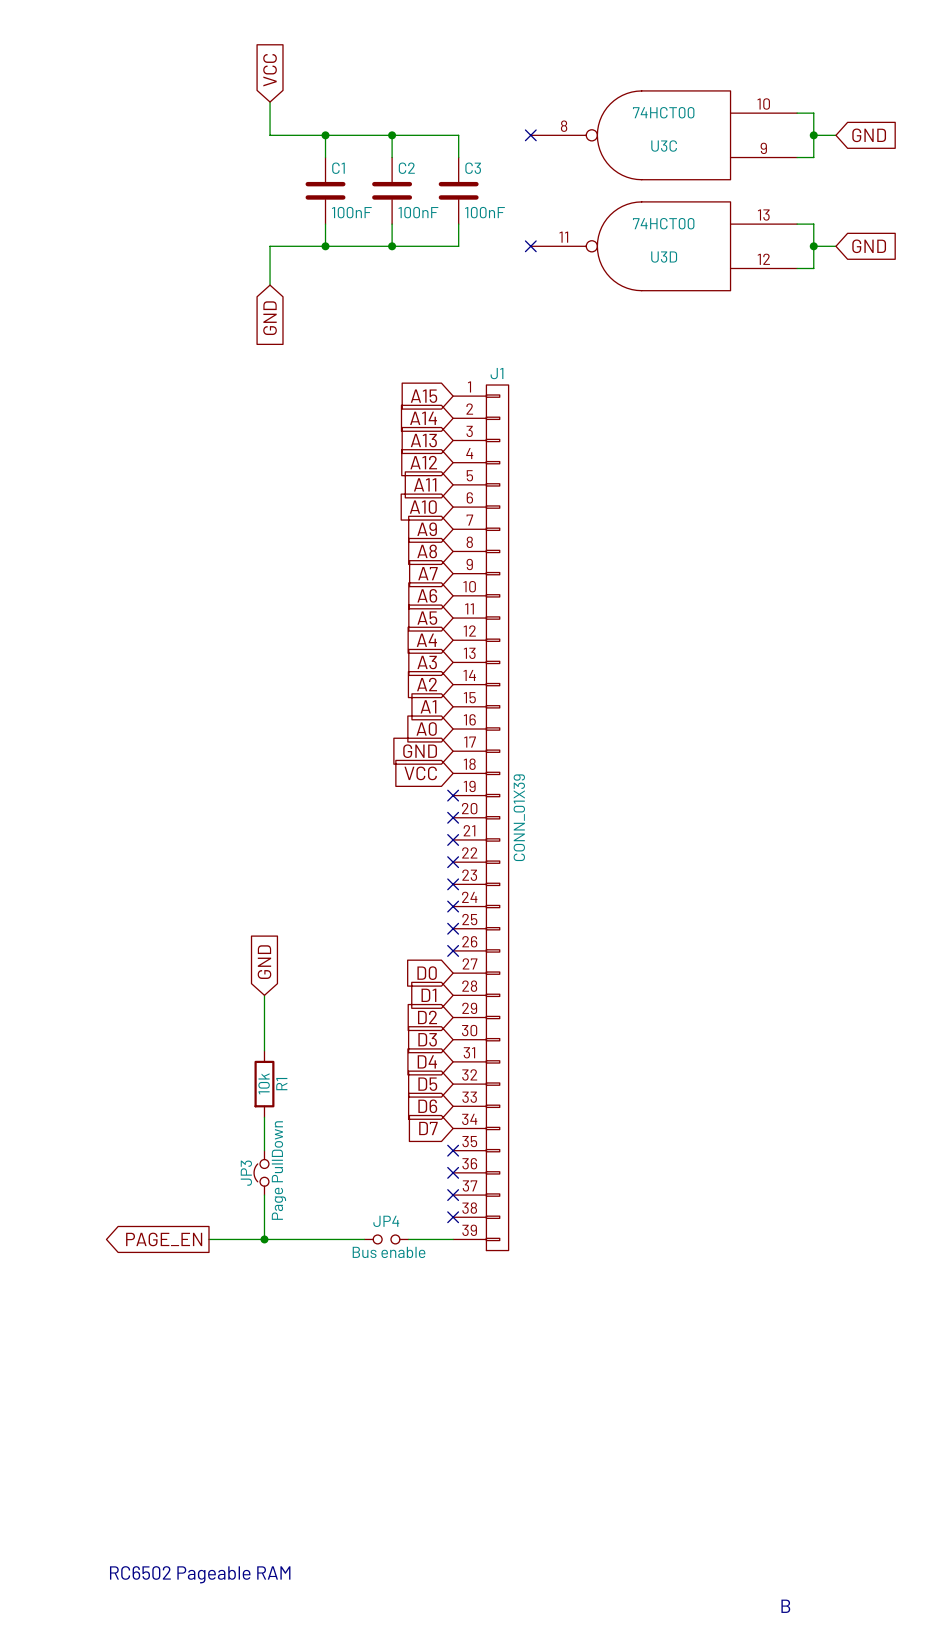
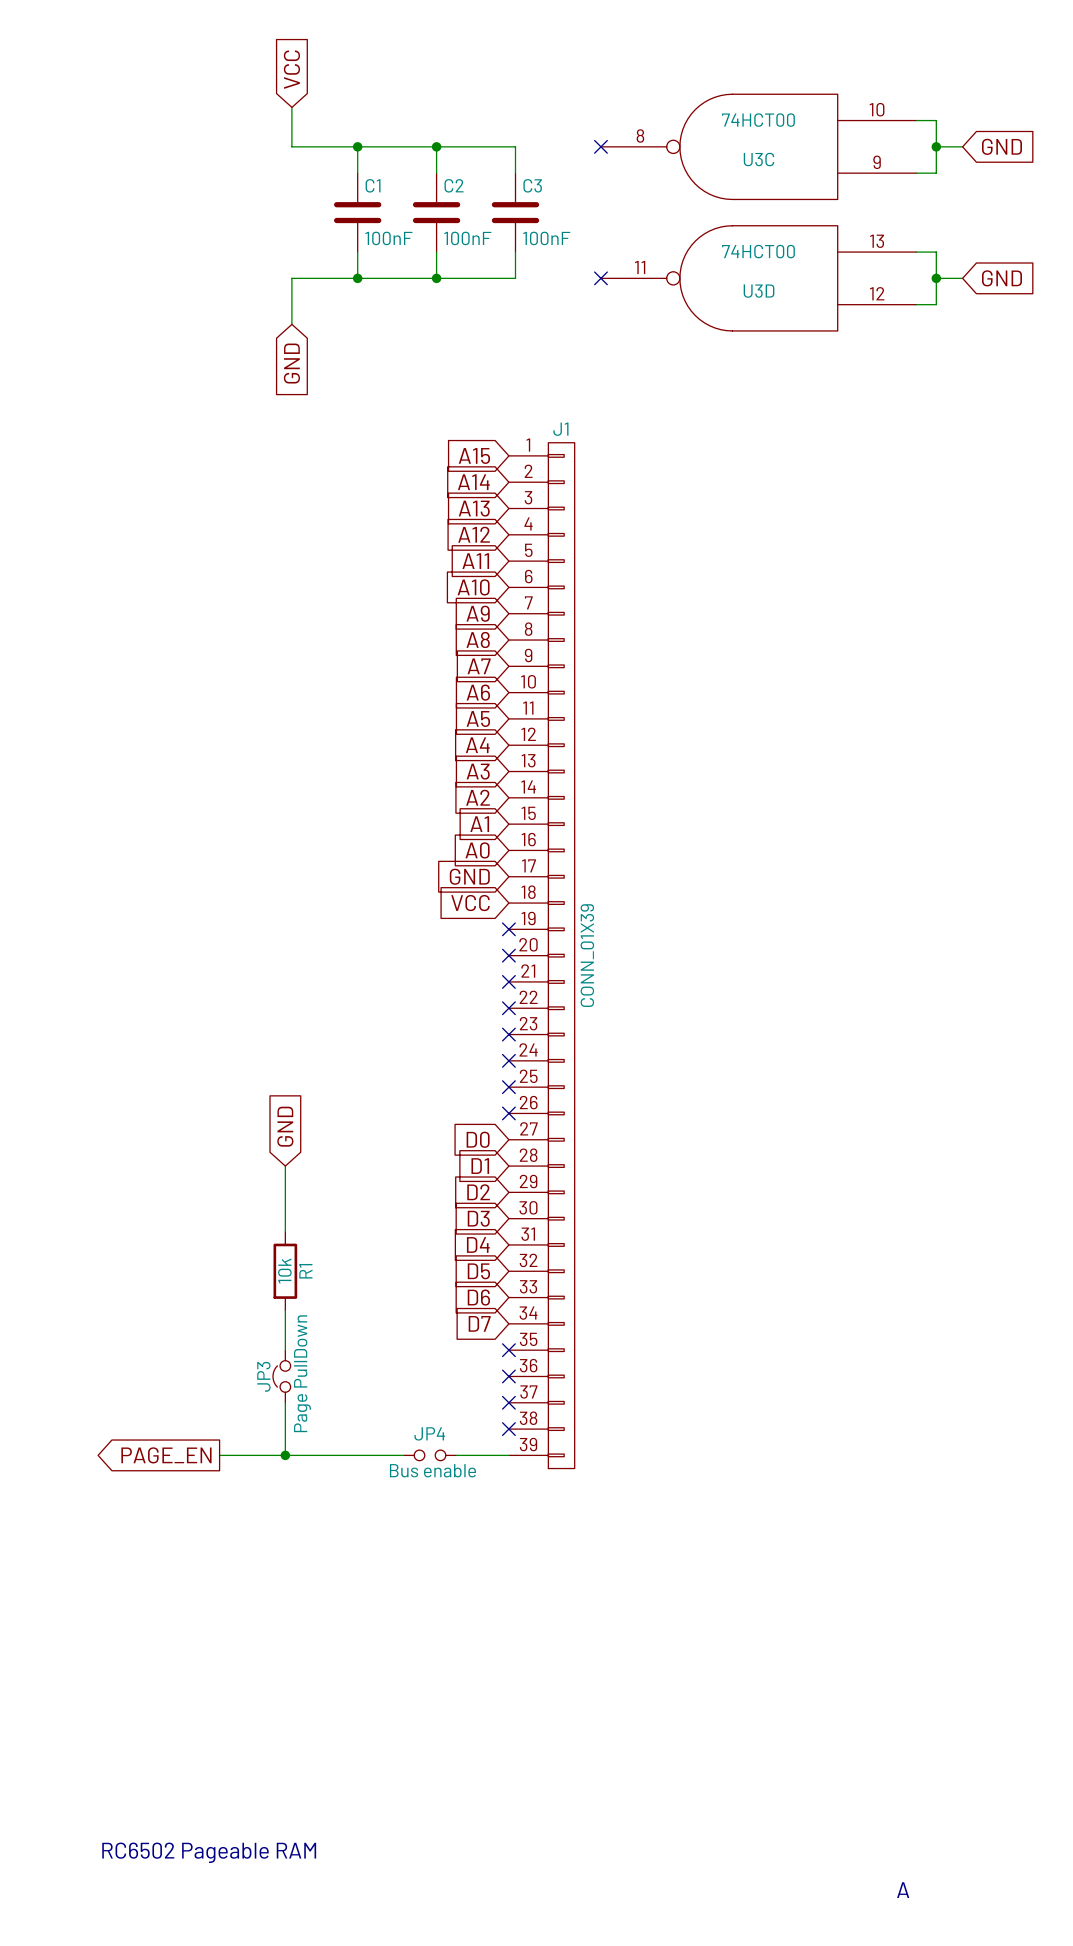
text: B (785, 1606) -> A (903, 1890)

